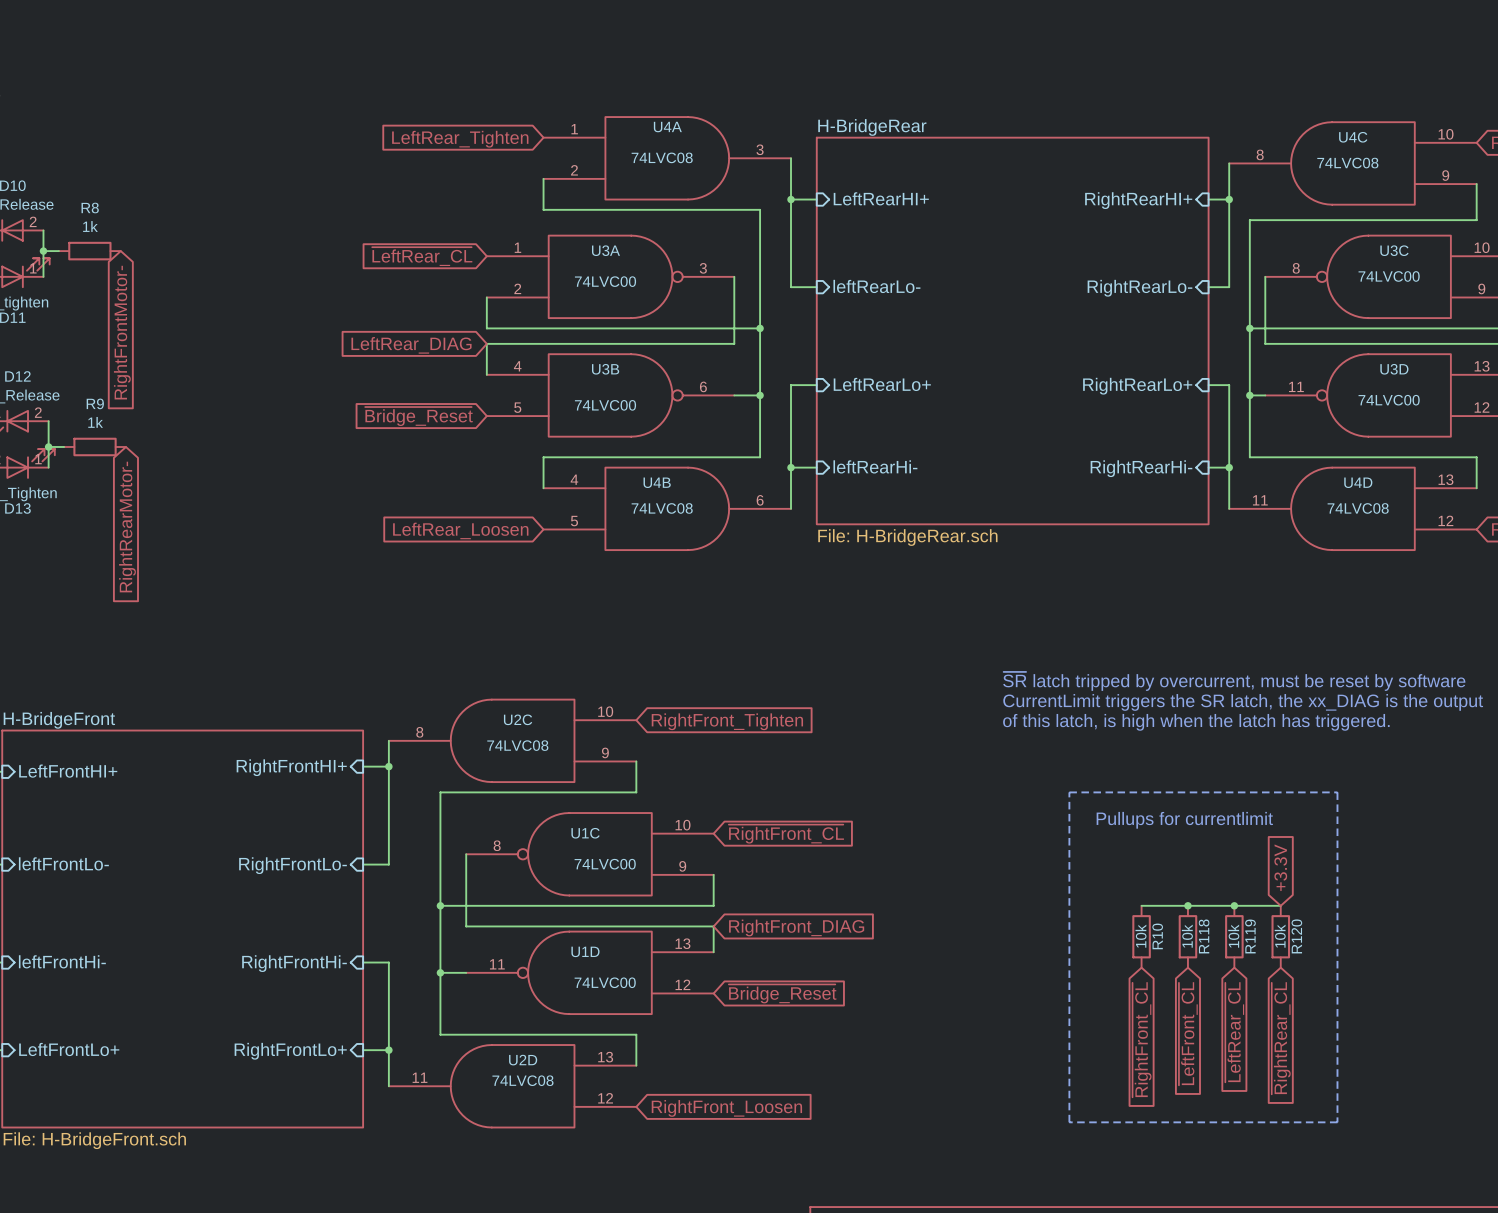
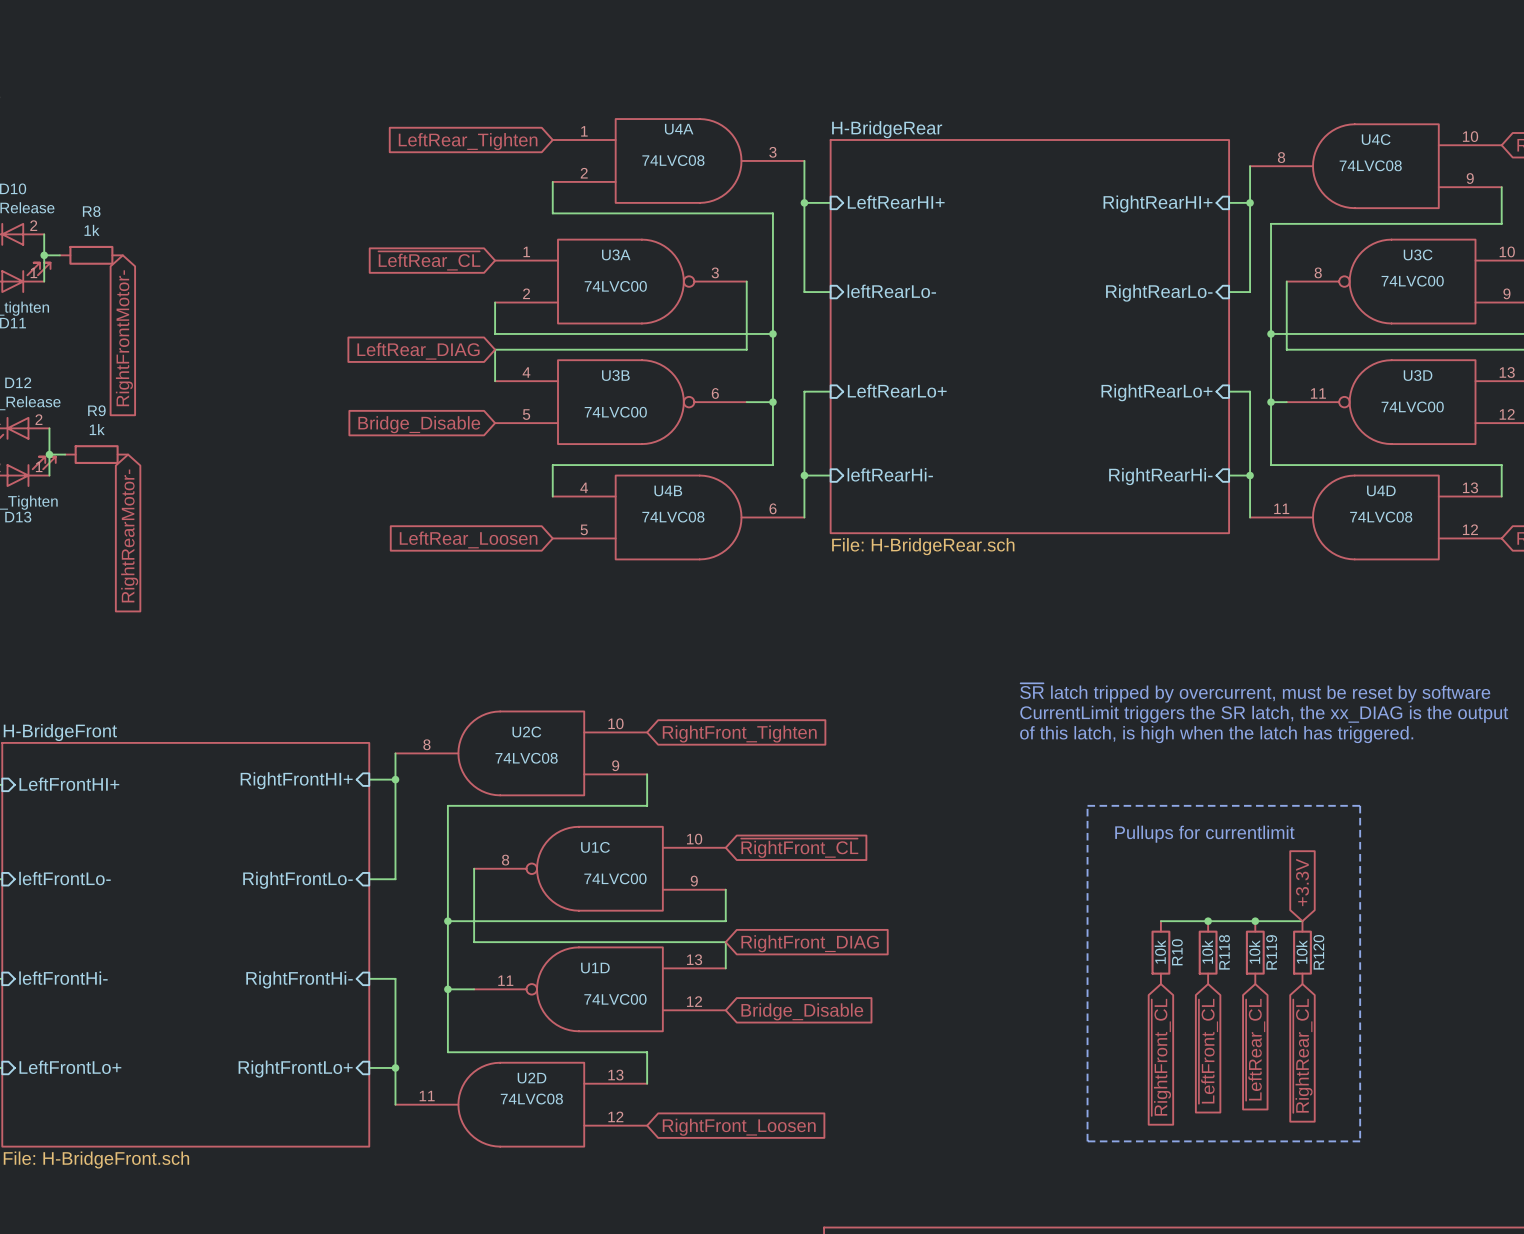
global label: ~{Bridge_Reset} (418, 416) -> Bridge_Disable (419, 424)
global label: ~{Bridge_Reset} (782, 993) -> Bridge_Disable (802, 1011)

